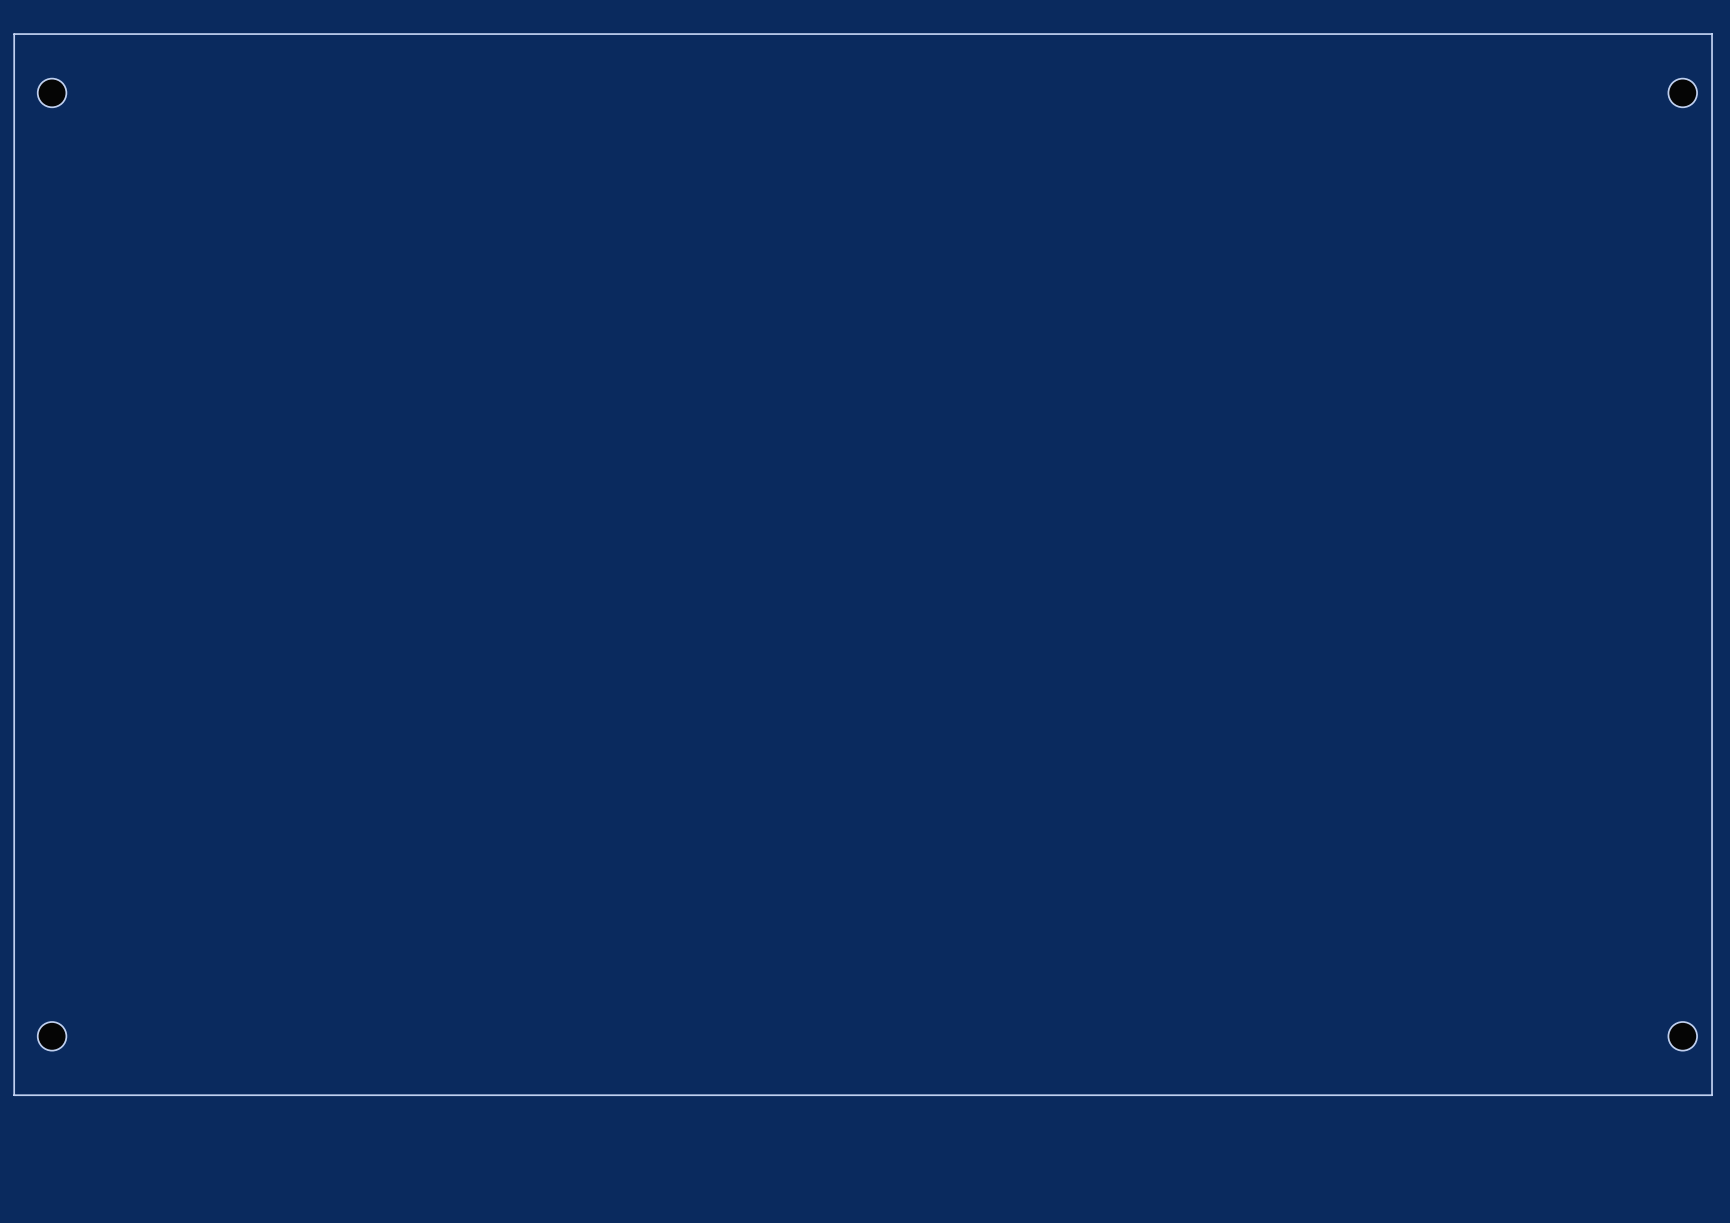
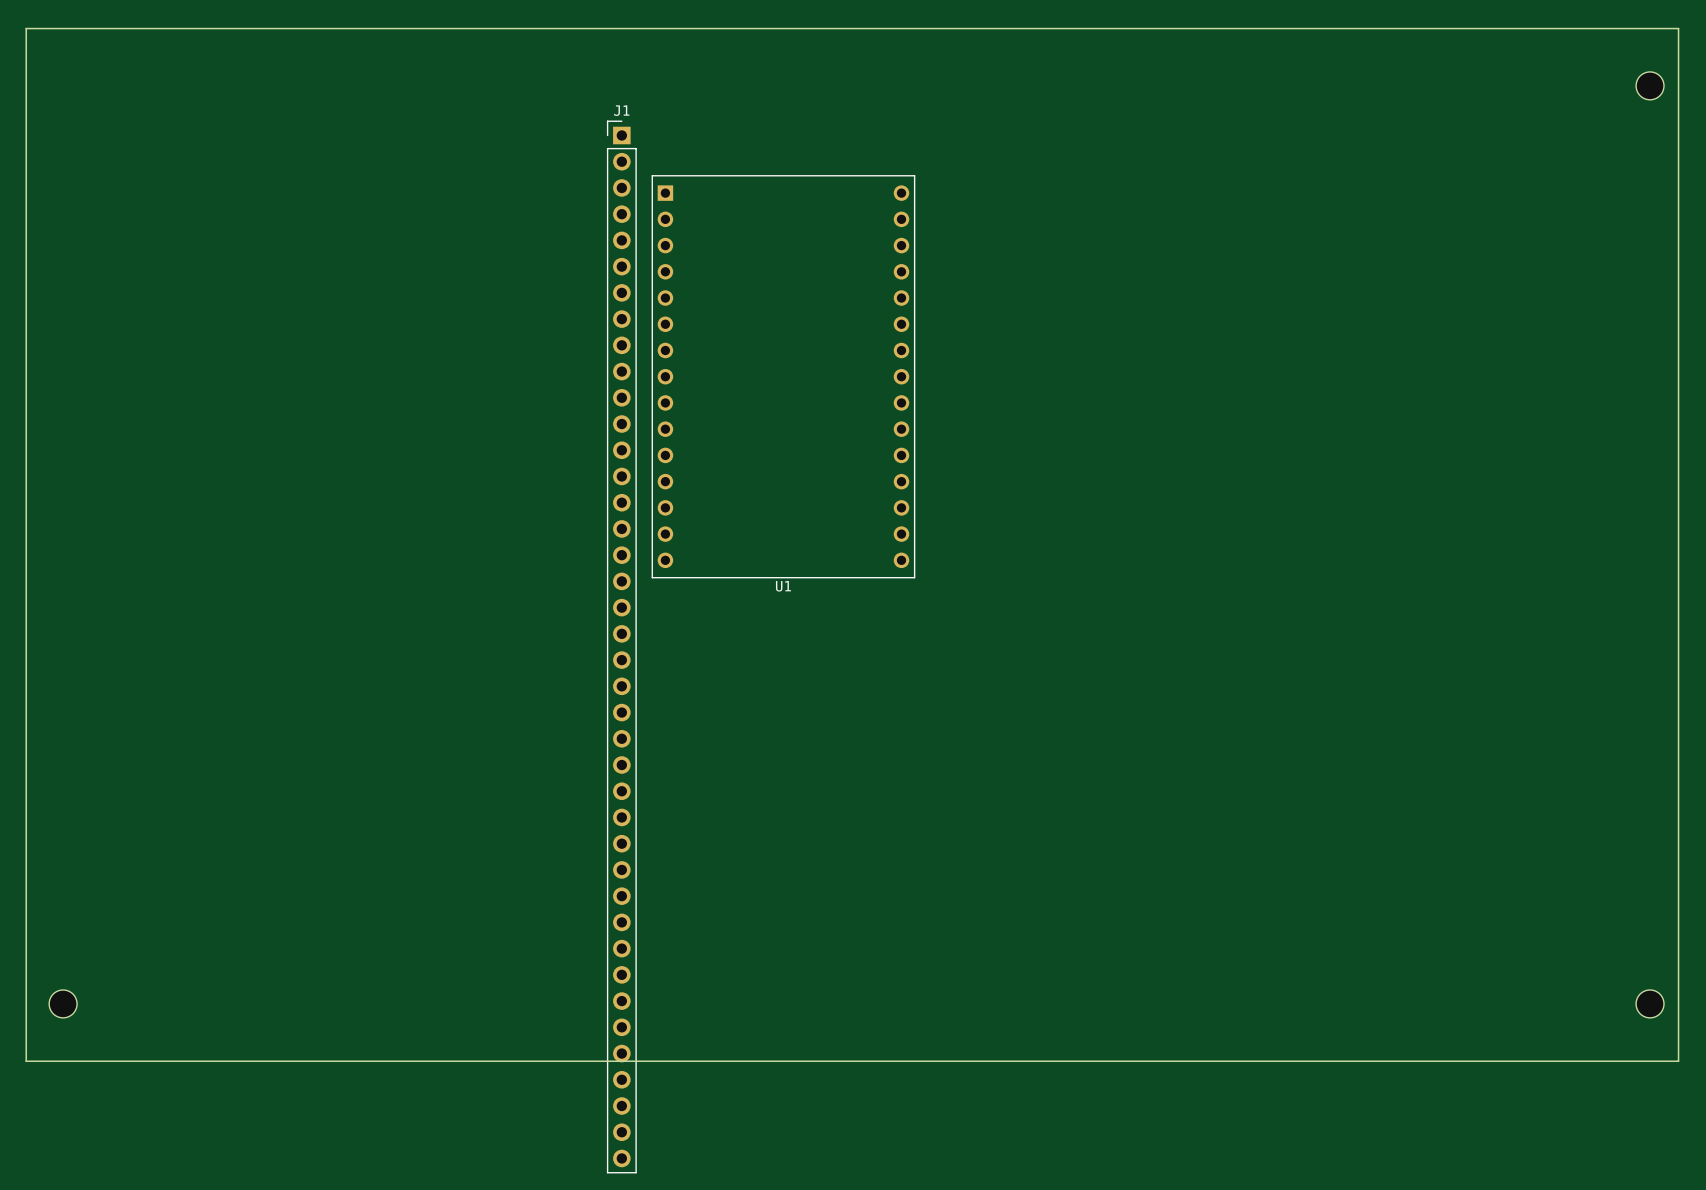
part: (52, 92) -> none
U1: none -> (783, 376)
J1: none -> (621, 646)

